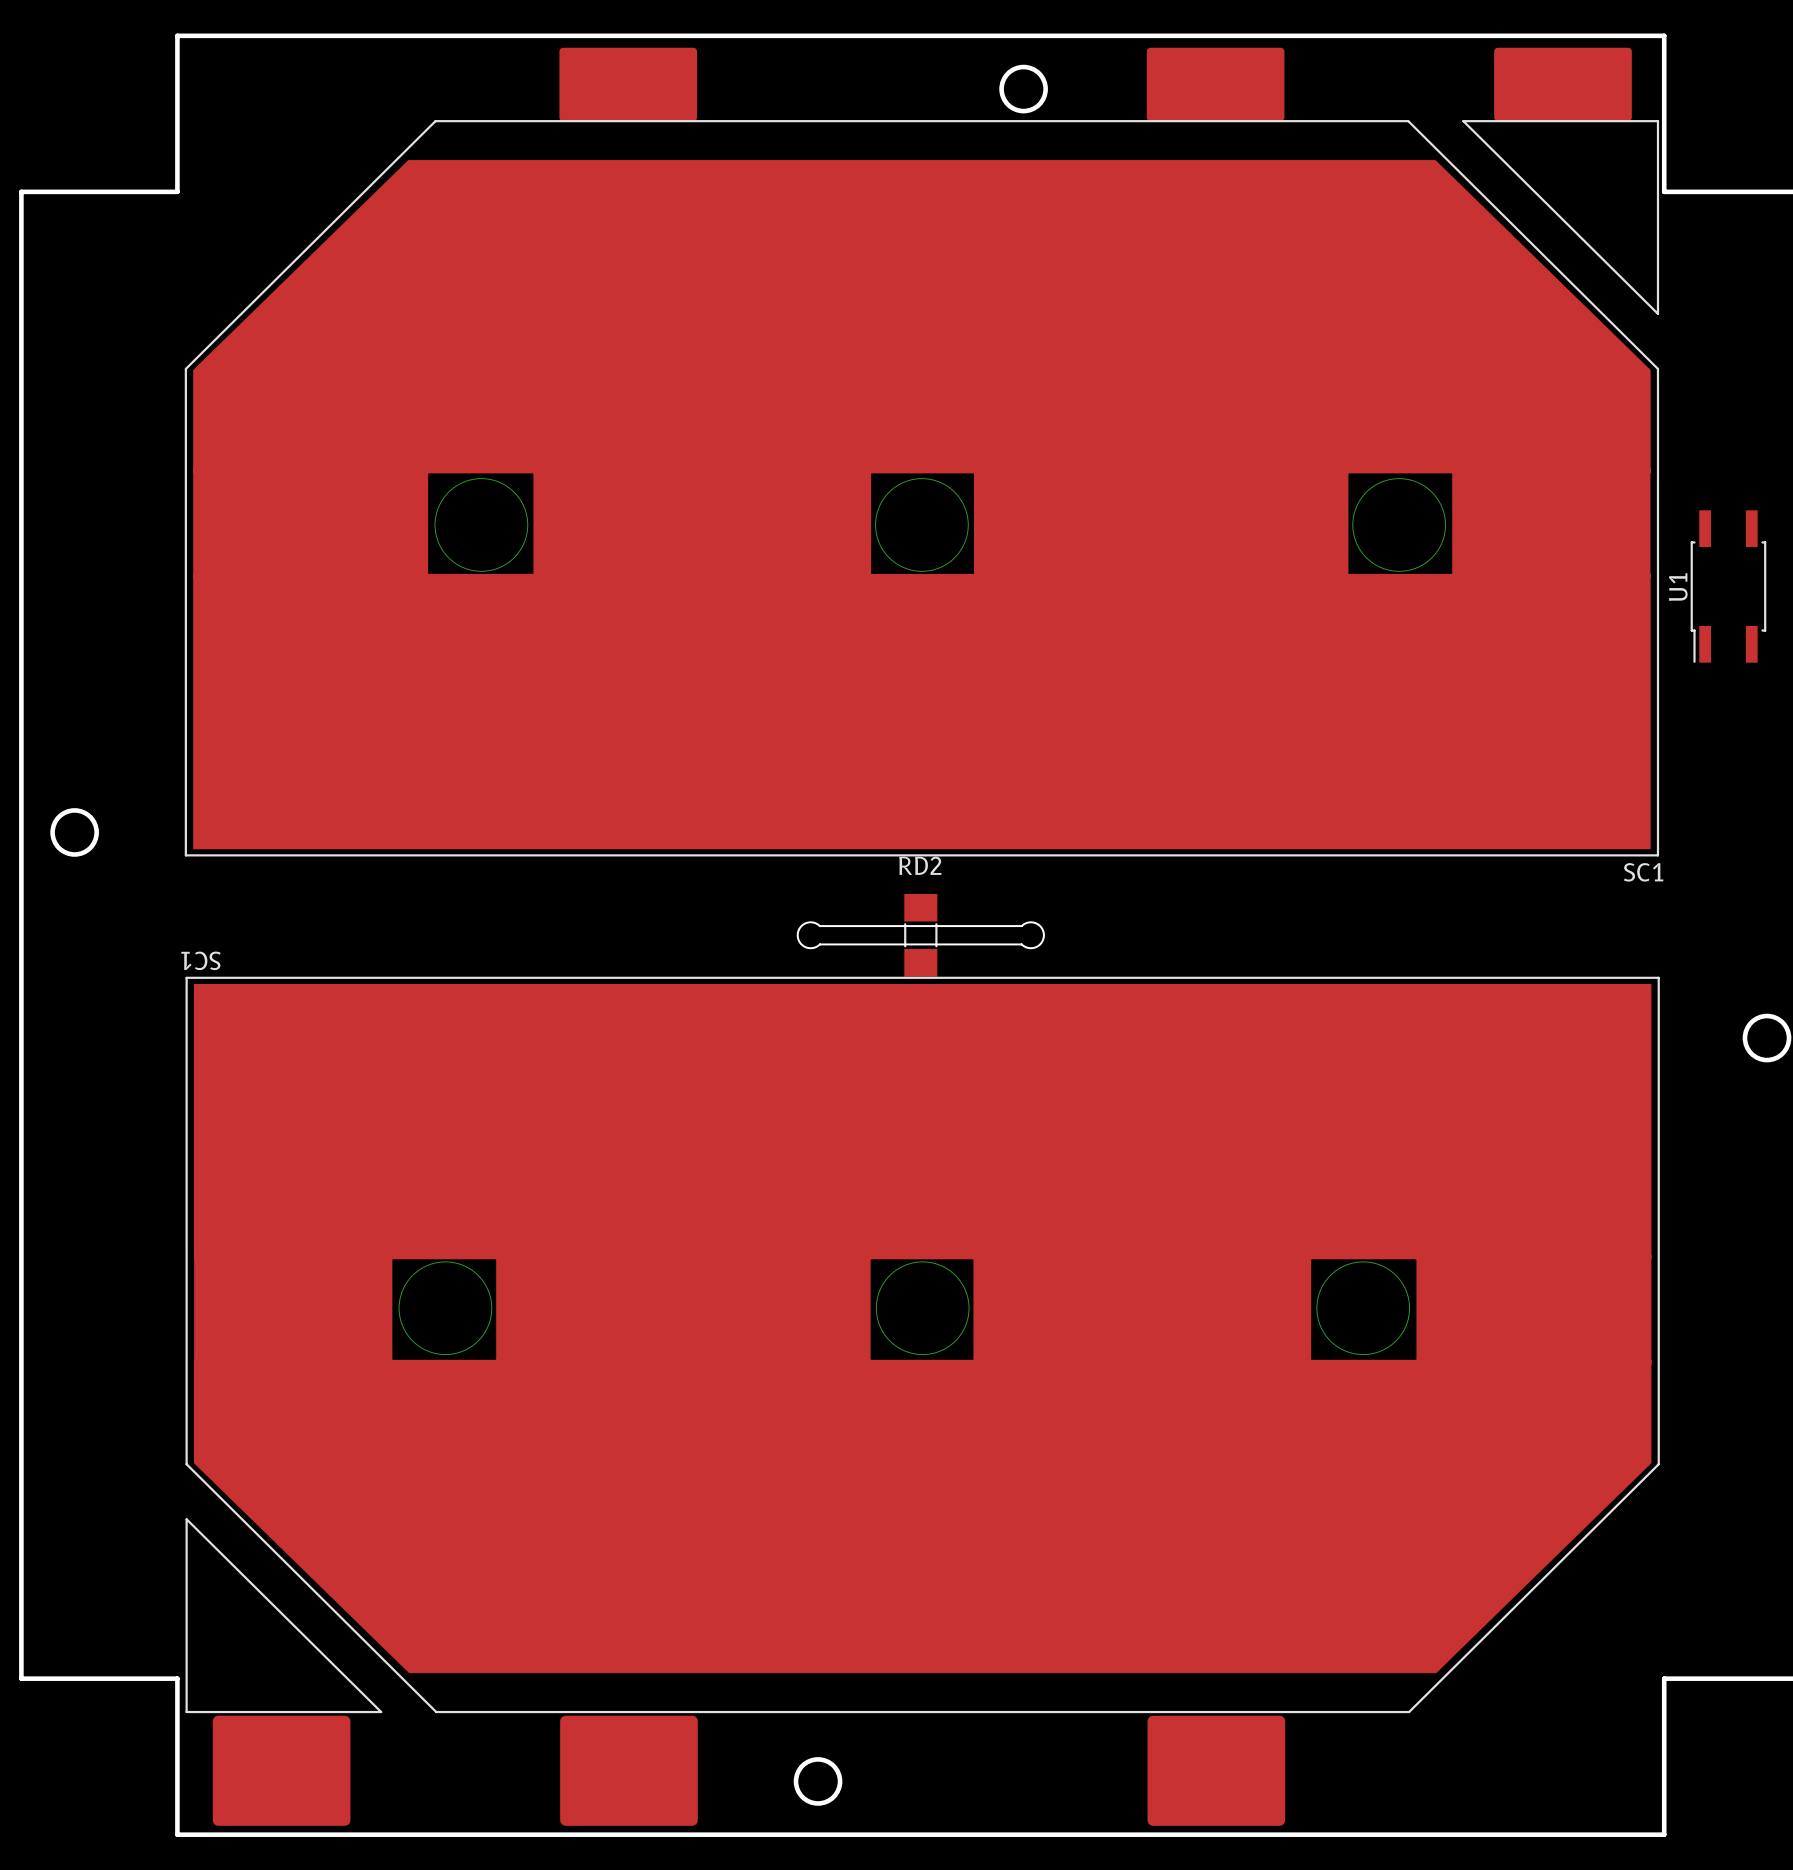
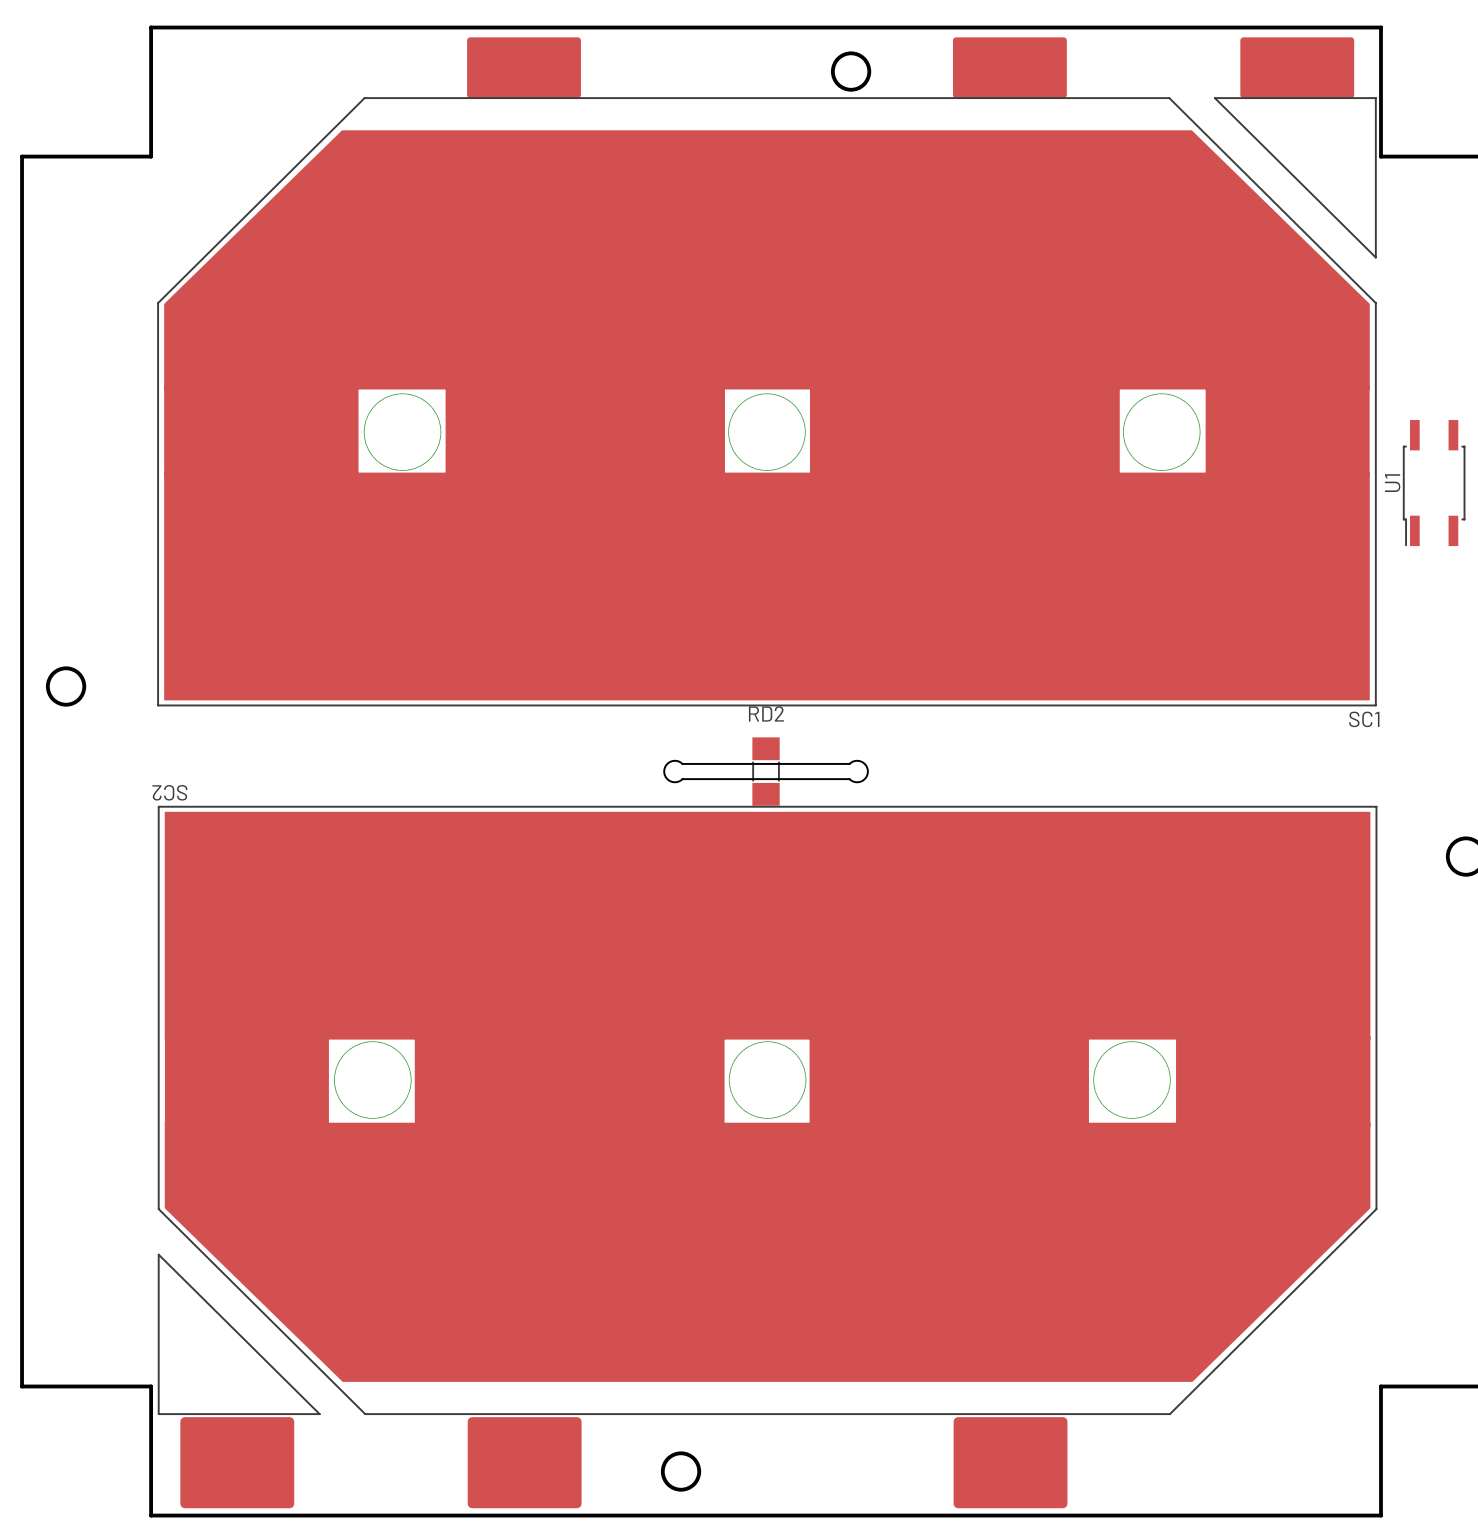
SC1 name: SC1 (201, 960) -> SC2 (169, 792)

